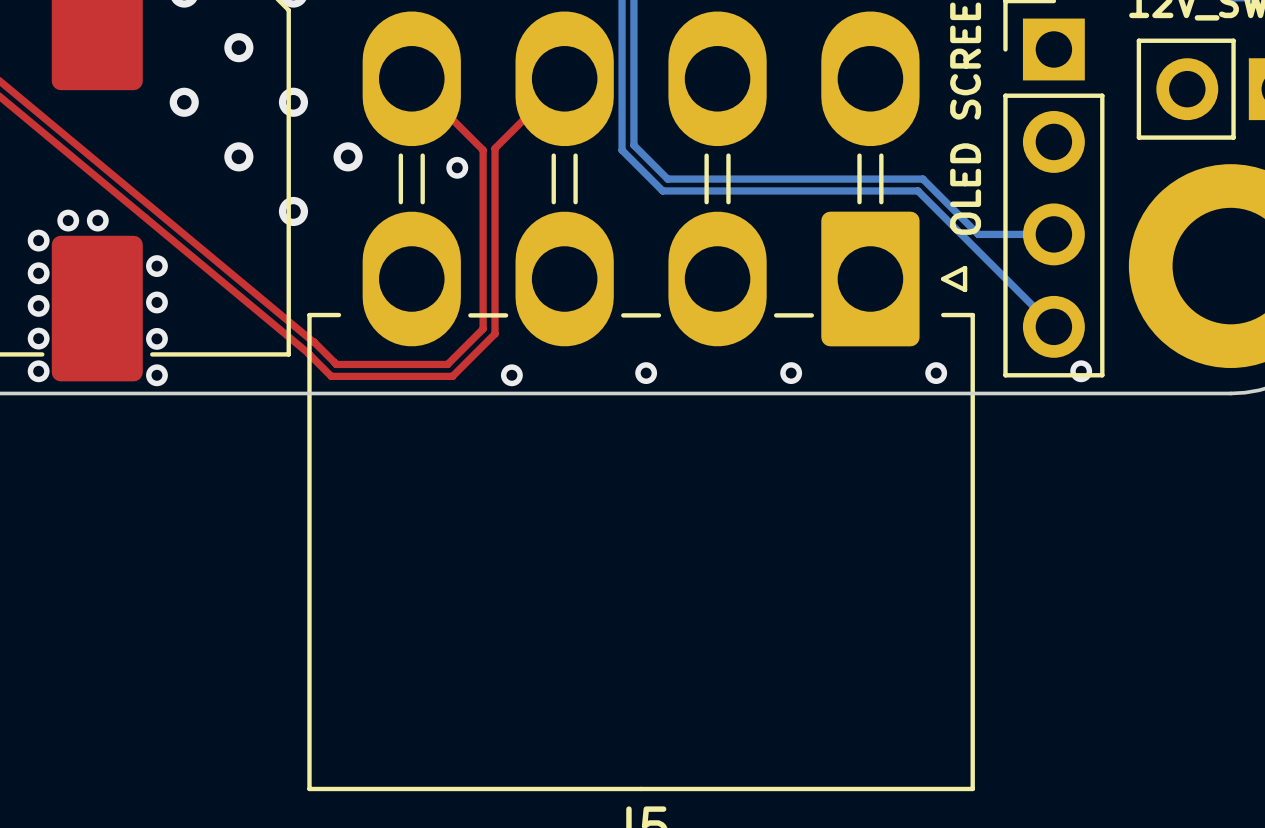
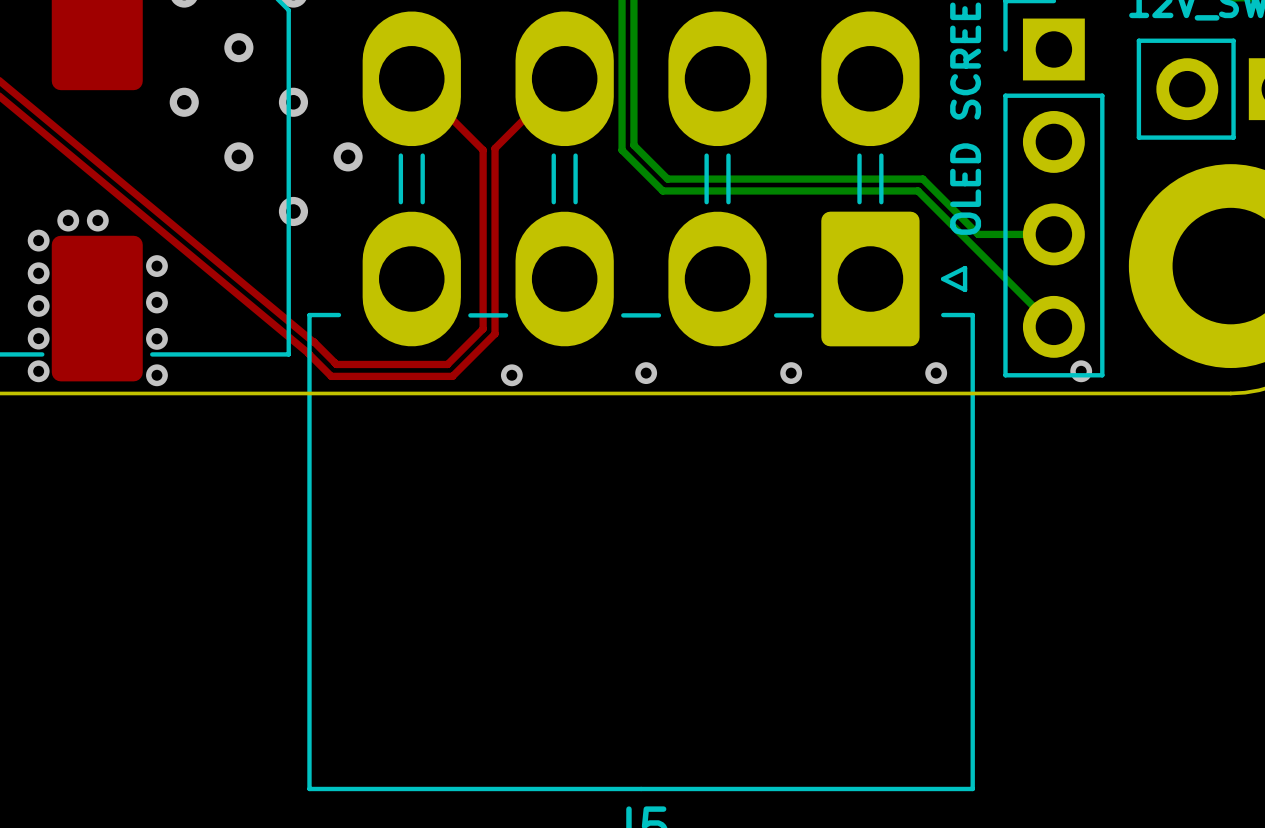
via: (457, 167) -> none

